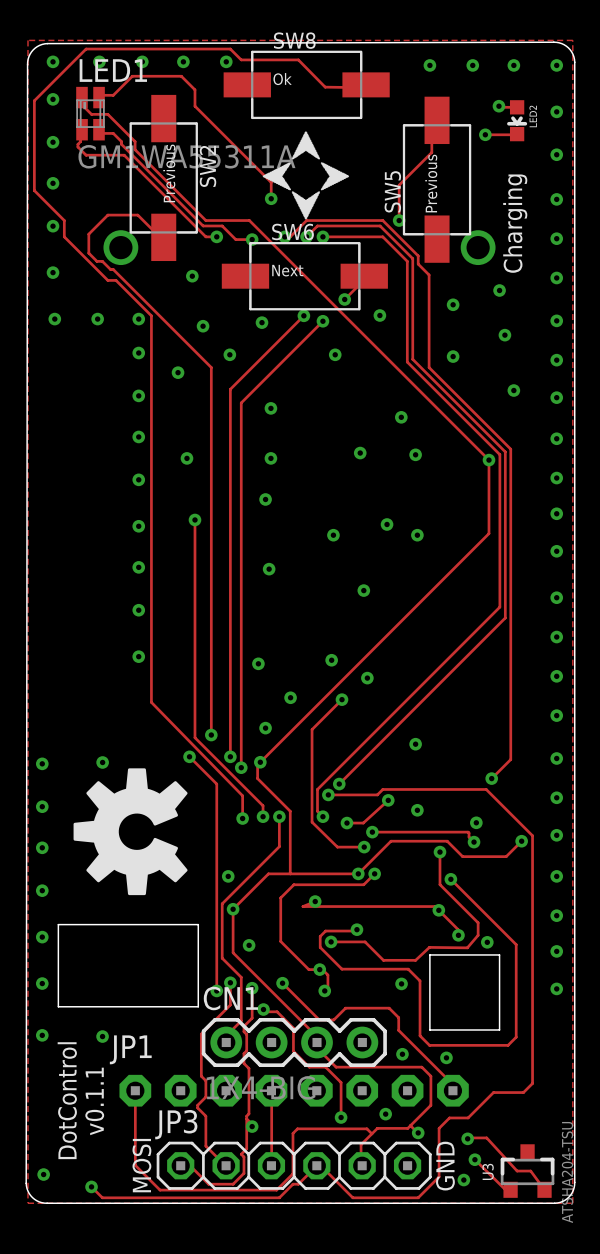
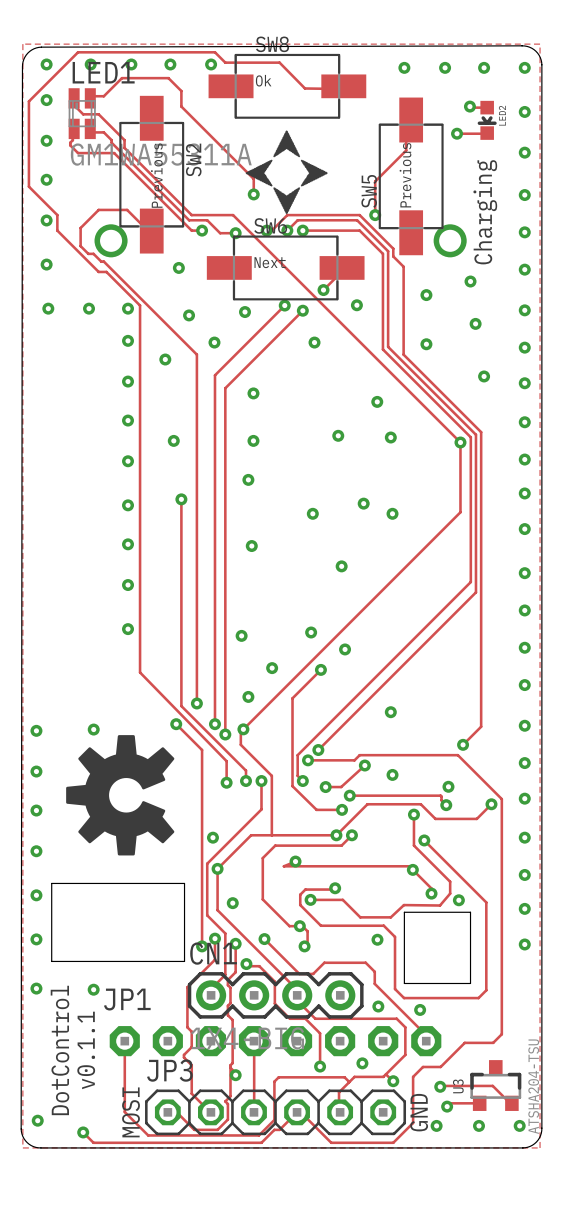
track: (486, 1137) (517, 1171) (530, 1171) (544, 1189) -> (458, 1085) (492, 1085) (511, 1103)
track: none -> (450, 1103) (479, 1103)
track: (474, 1159) (505, 1189) (510, 1189) -> none
U3 position: (527, 1171) -> (495, 1085)
via: none -> (478, 1125)
via: none -> (519, 1125)

